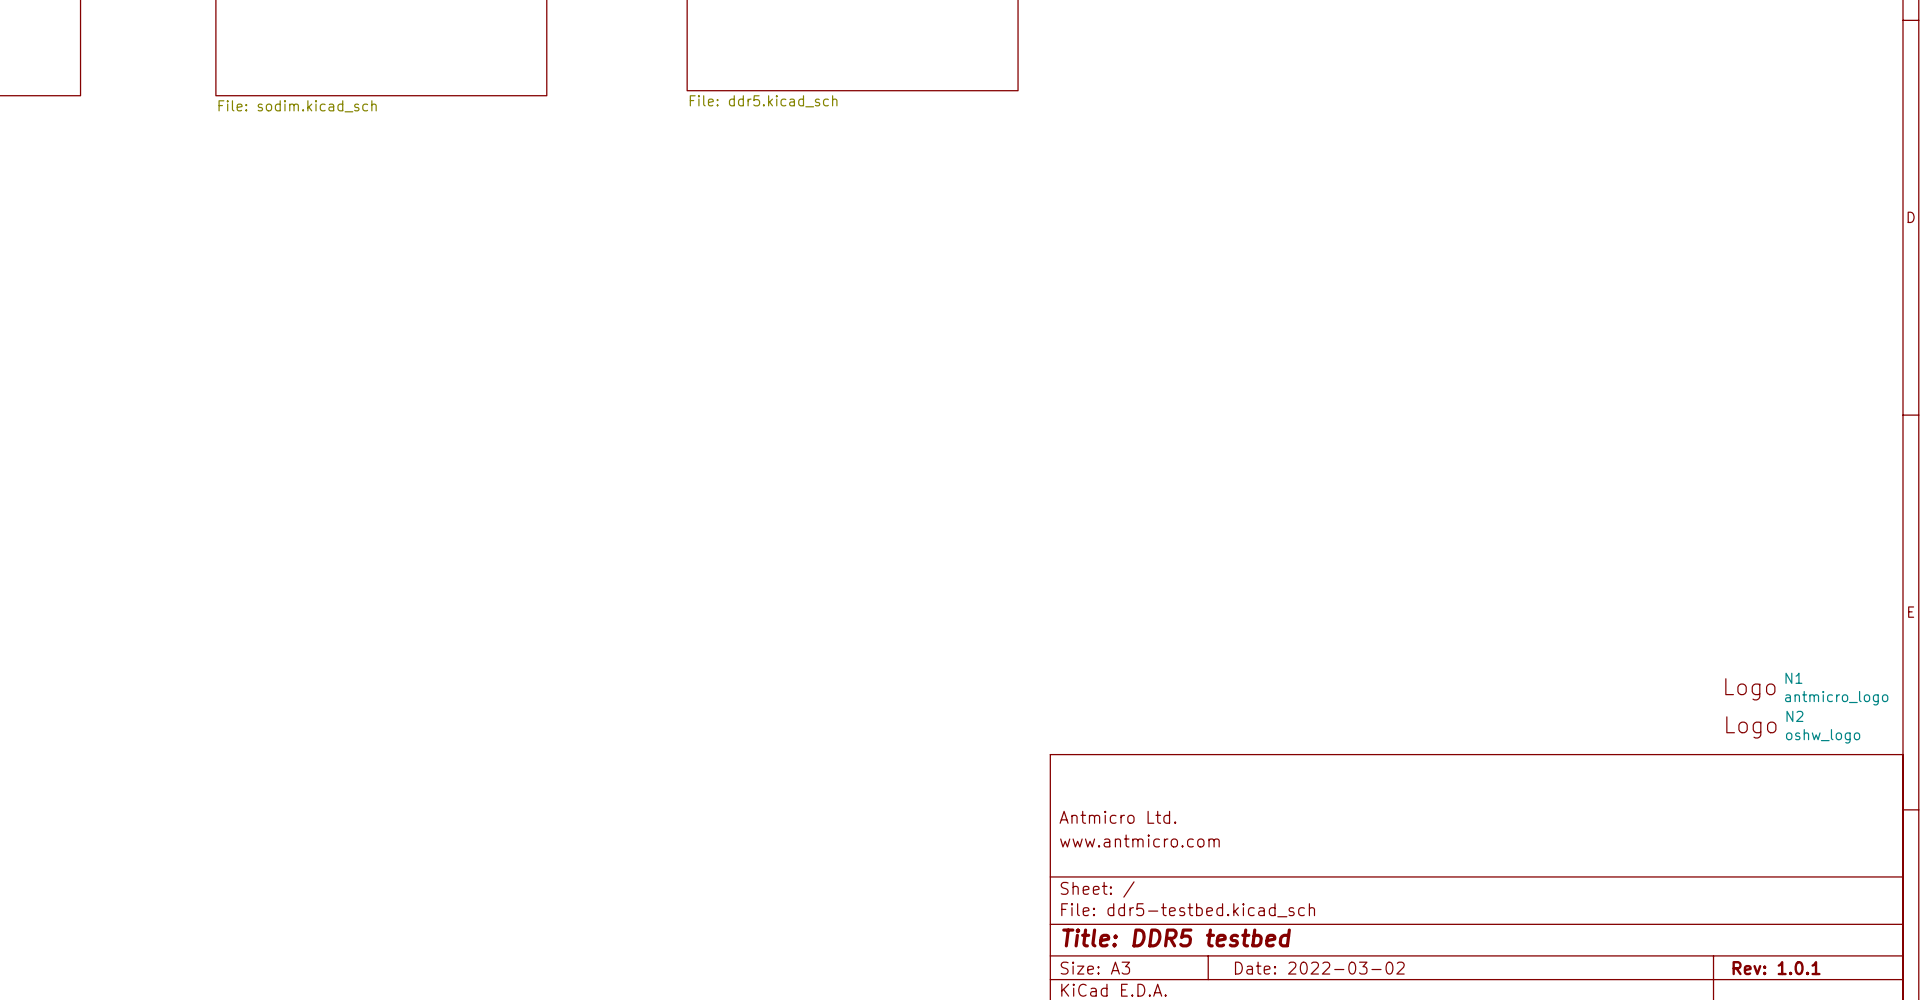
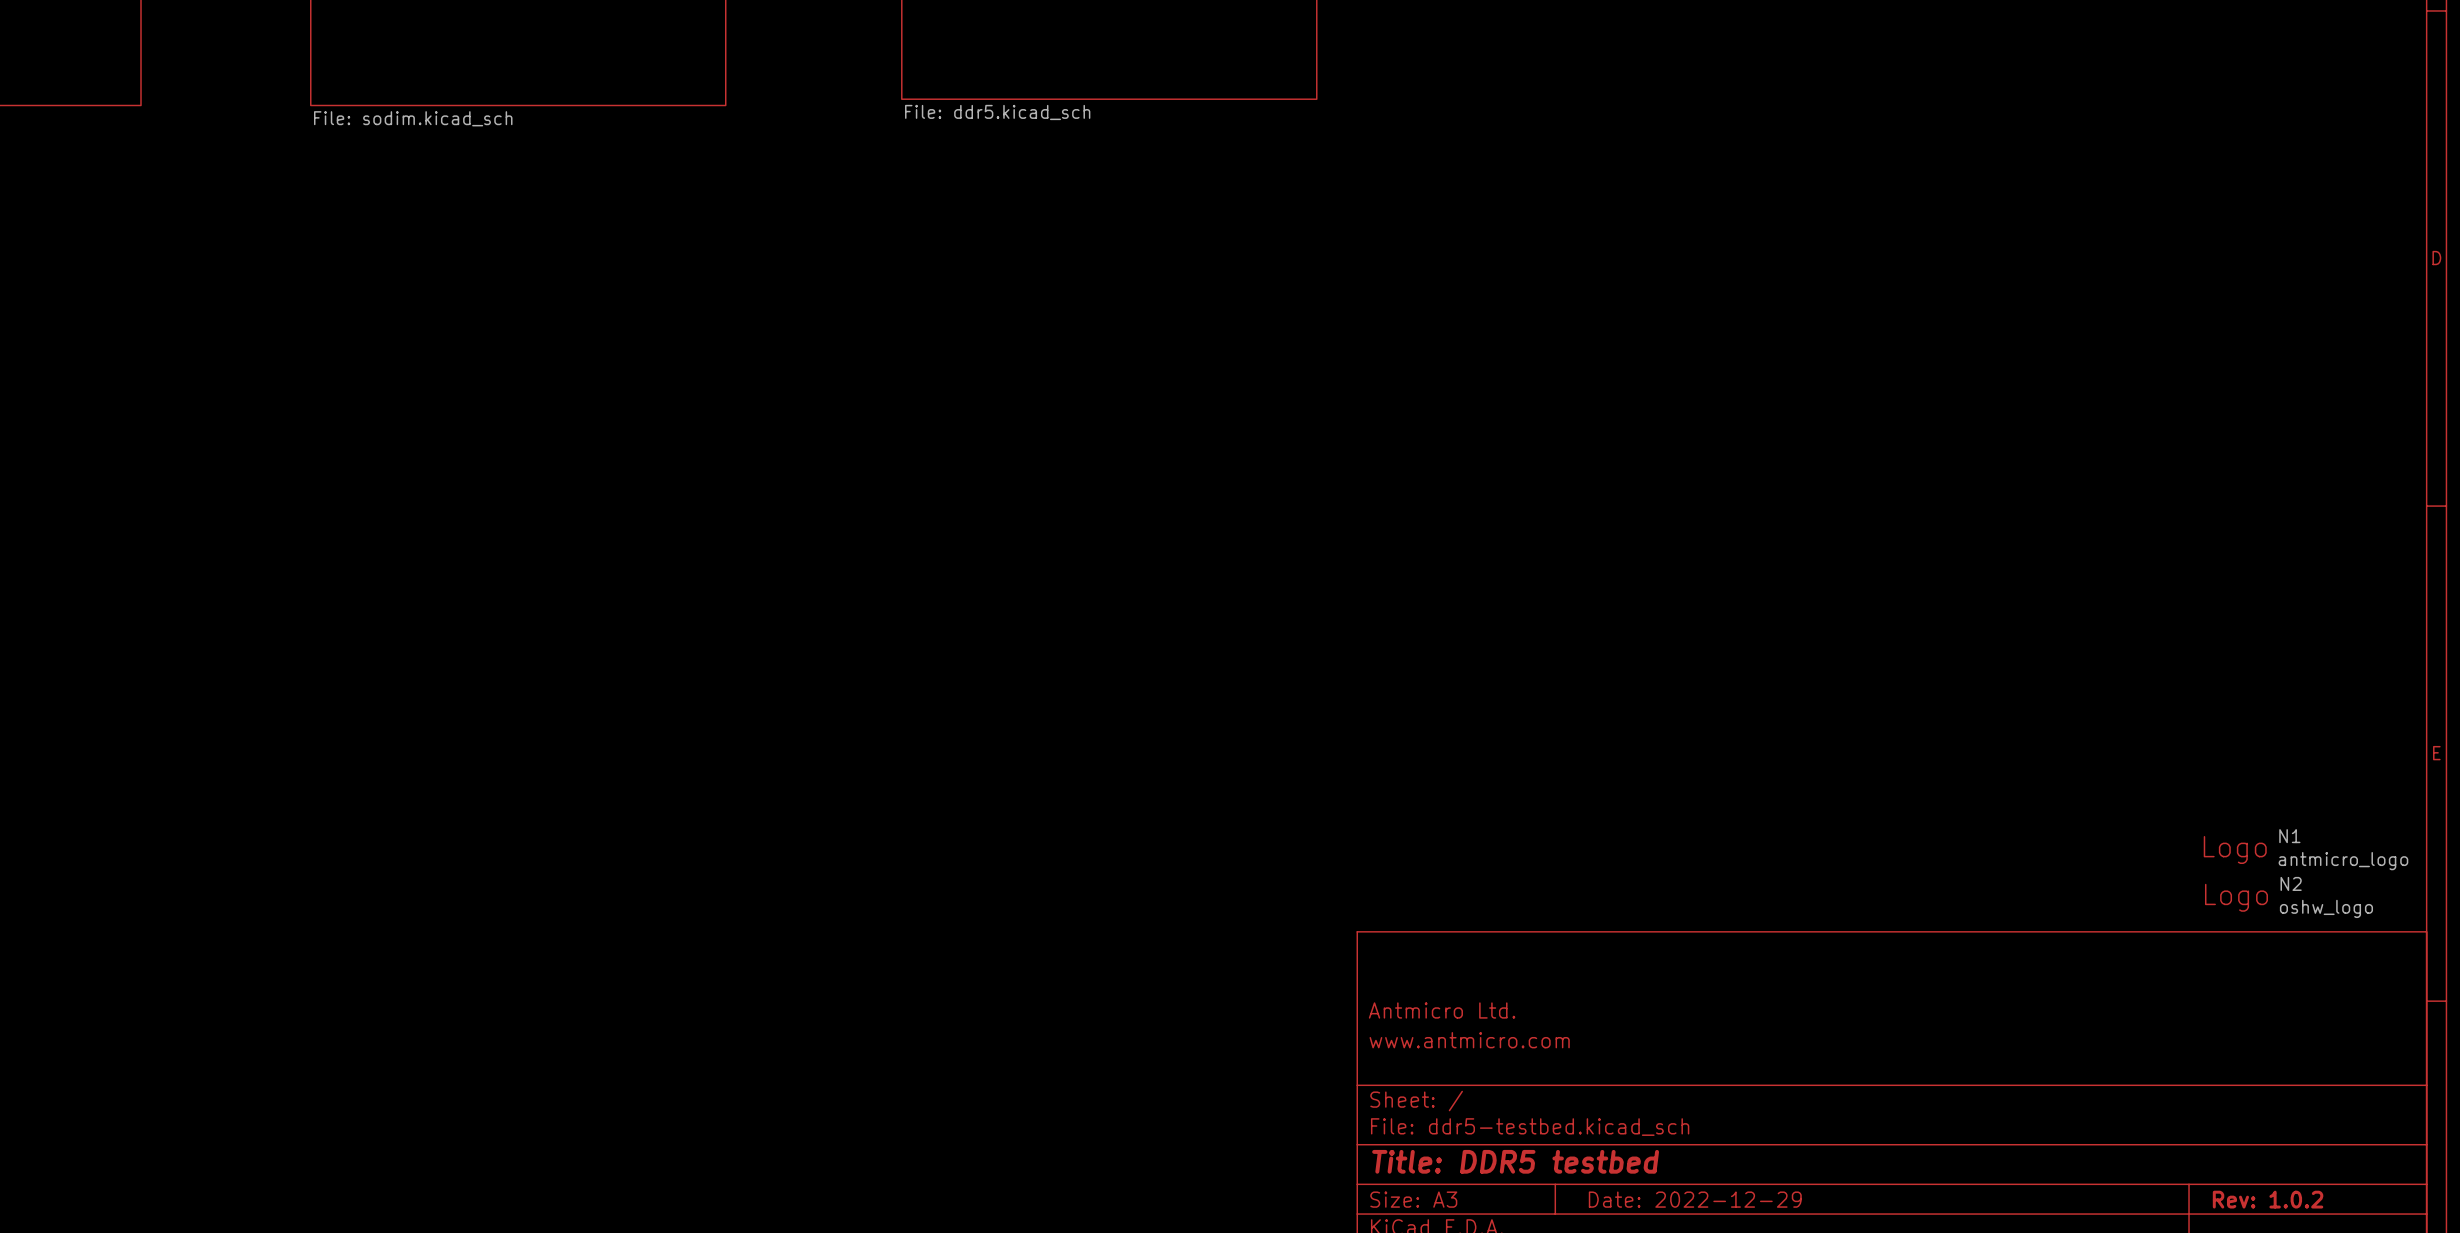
title block: Date: 2022-03-02 (1319, 968) -> Date: 2022-12-29 (1695, 1199)
title block: Rev: 1.0.1 (1776, 968) -> Rev: 1.0.2 (2268, 1199)

